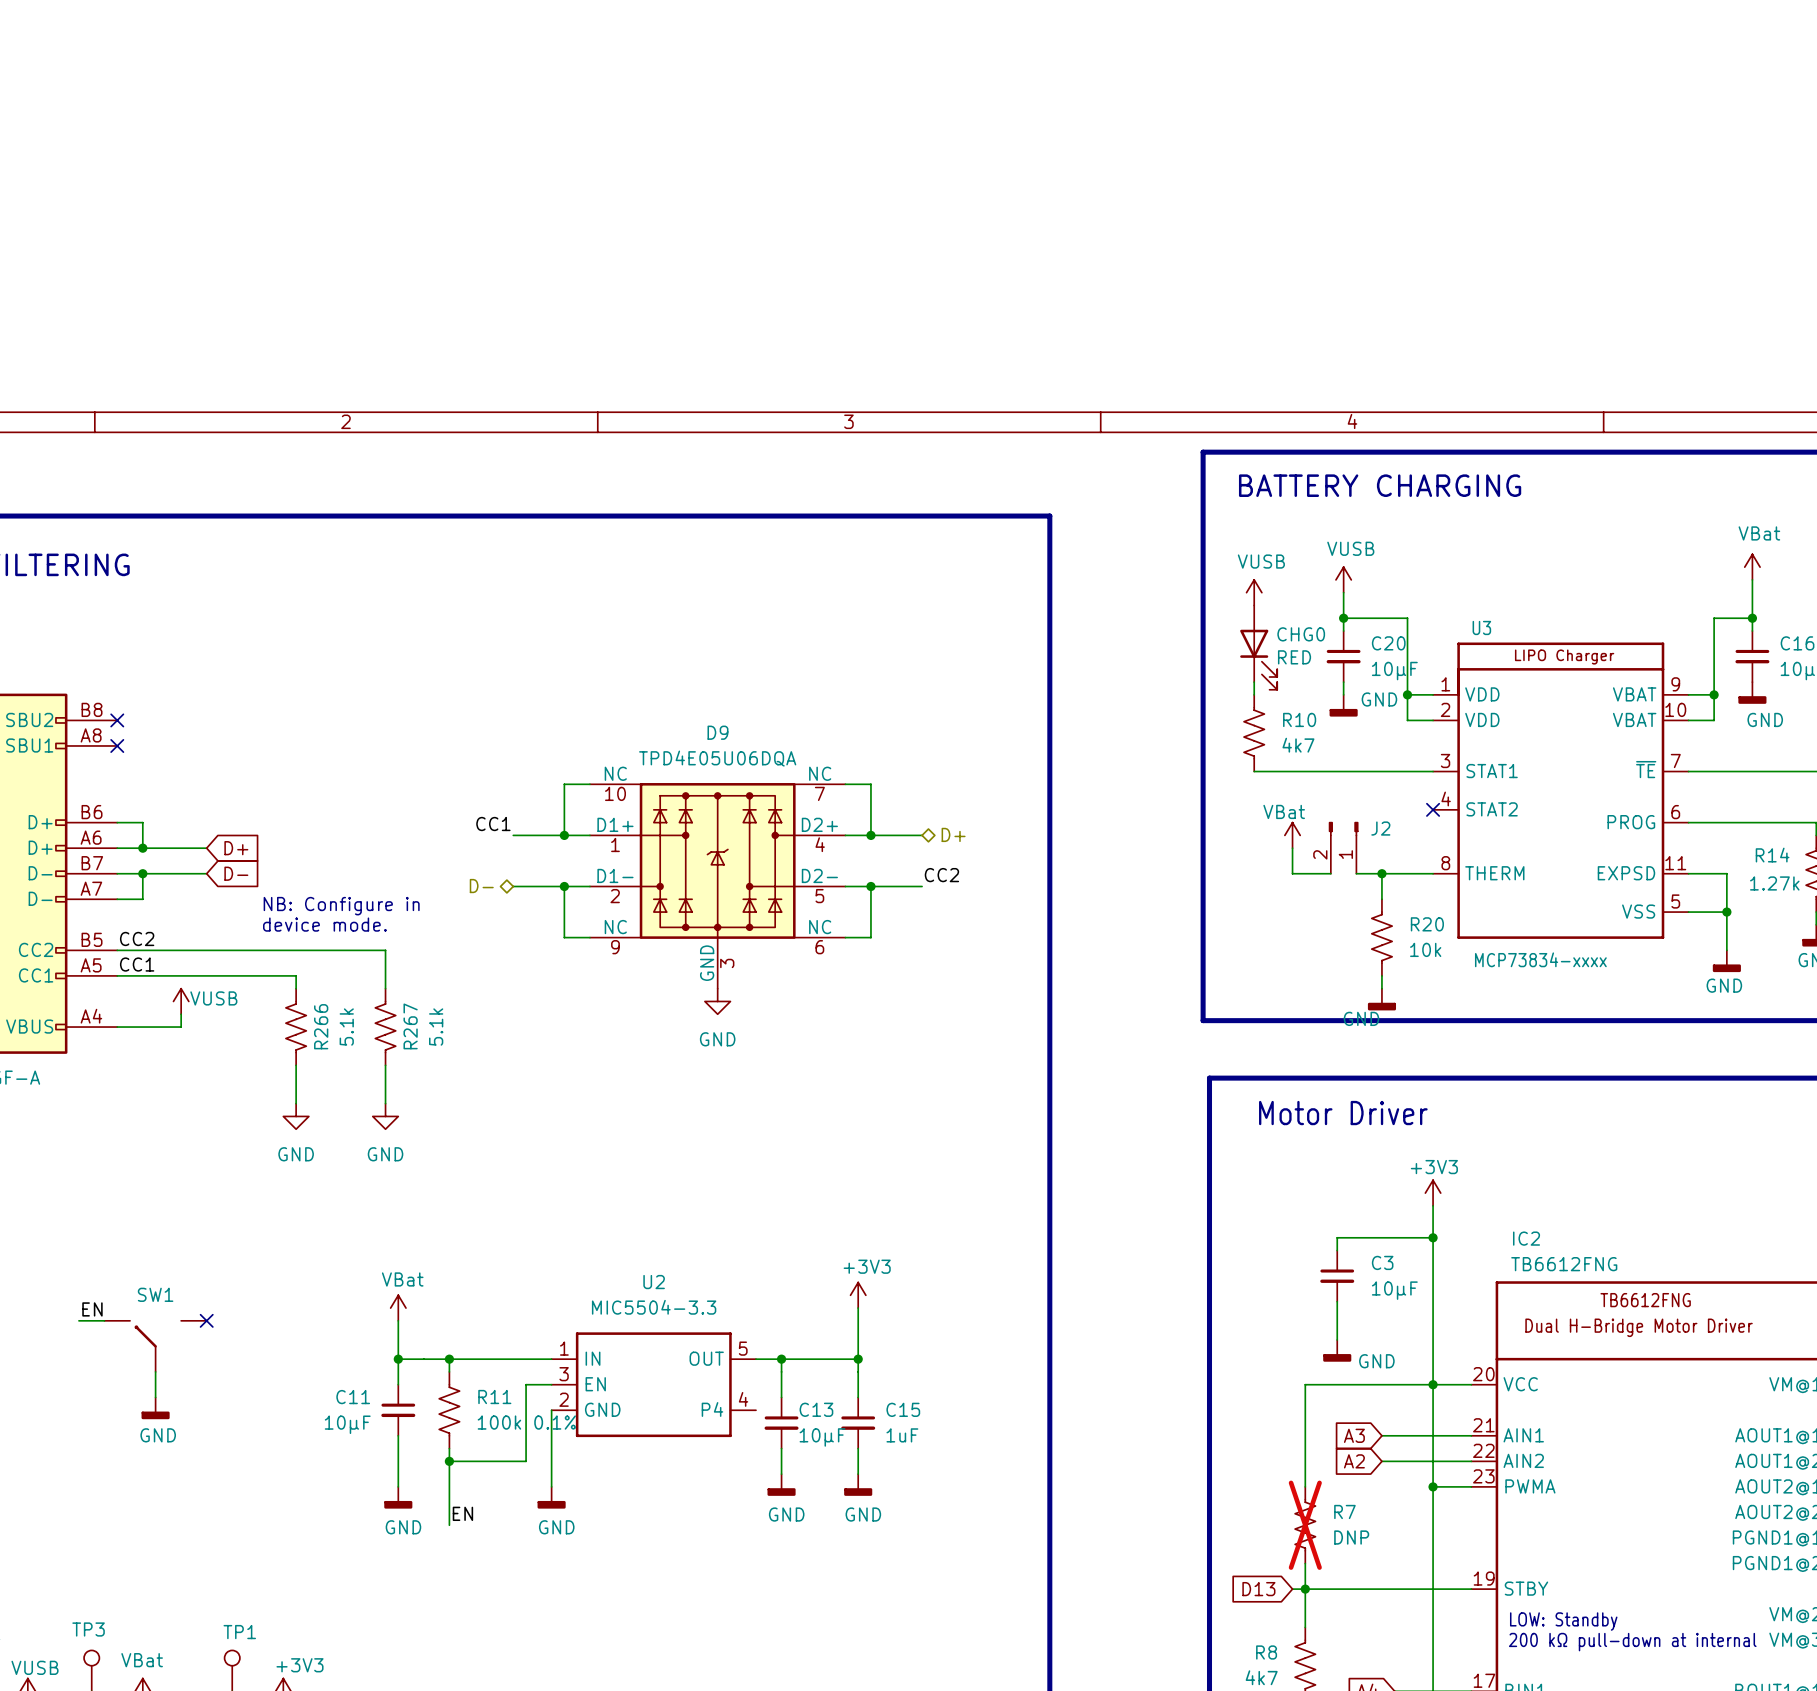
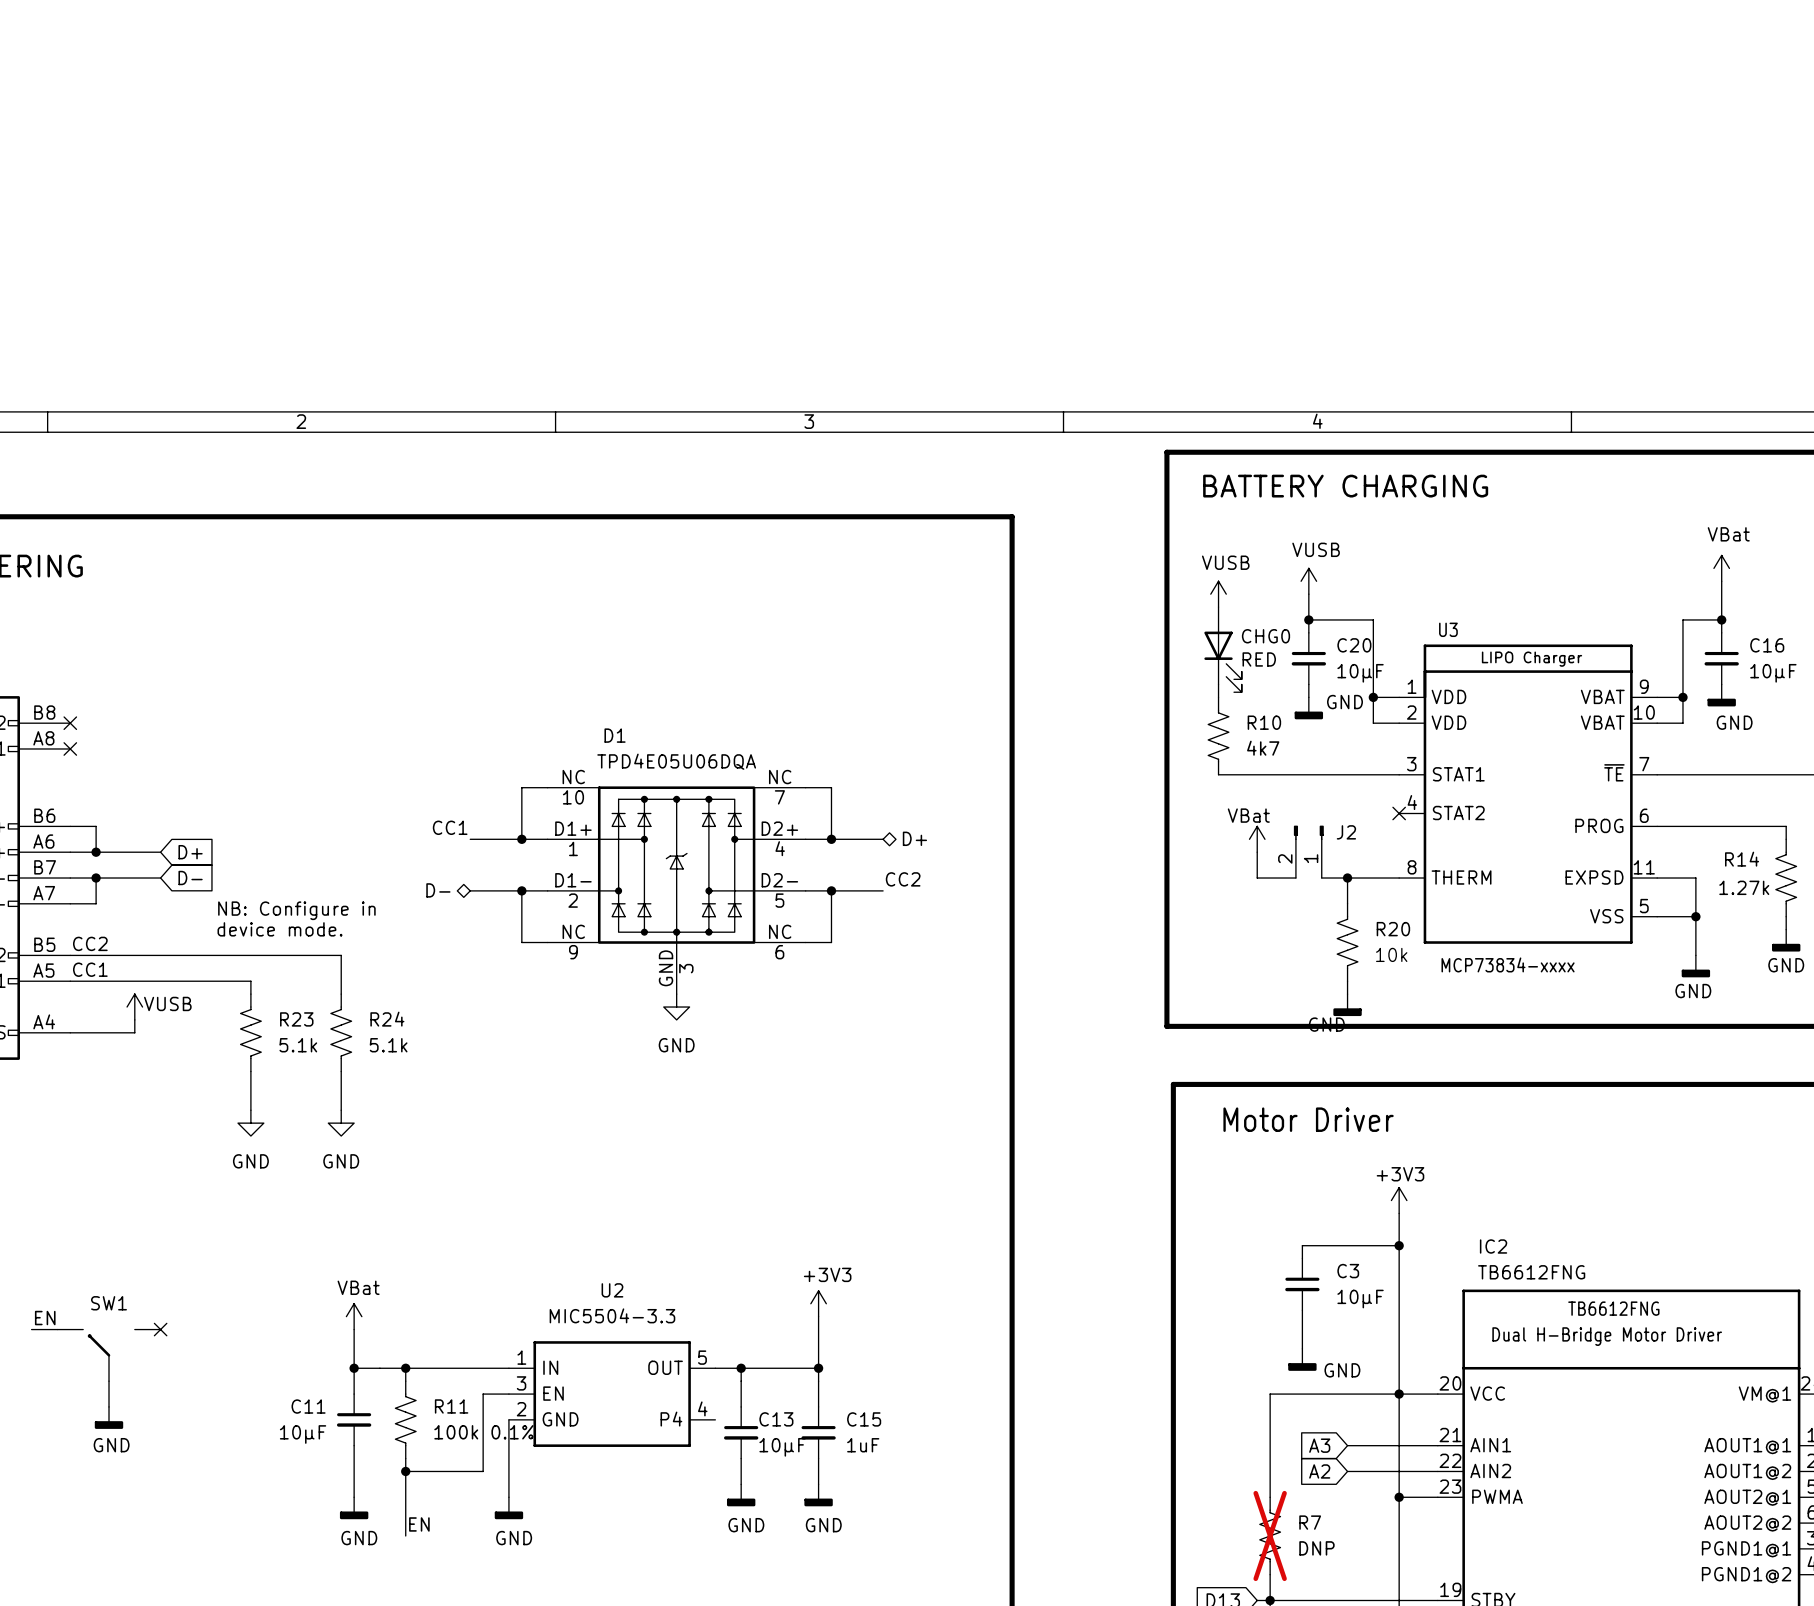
D9 name: D9 (717, 732) -> D1 (615, 735)
R266 name: R266 (321, 1026) -> R23 (296, 1019)
R267 name: R267 (410, 1026) -> R24 (387, 1019)
R266 value rotation: 0° (346, 1027) -> 90° clockwise (298, 1045)
R267 value rotation: 0° (436, 1027) -> 90° clockwise (388, 1045)

